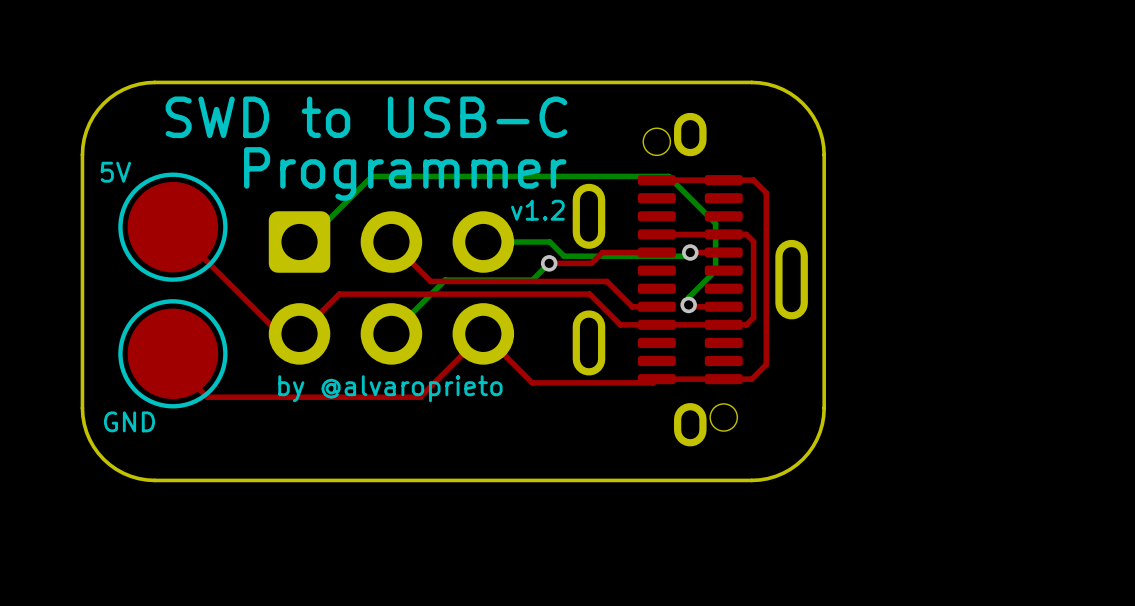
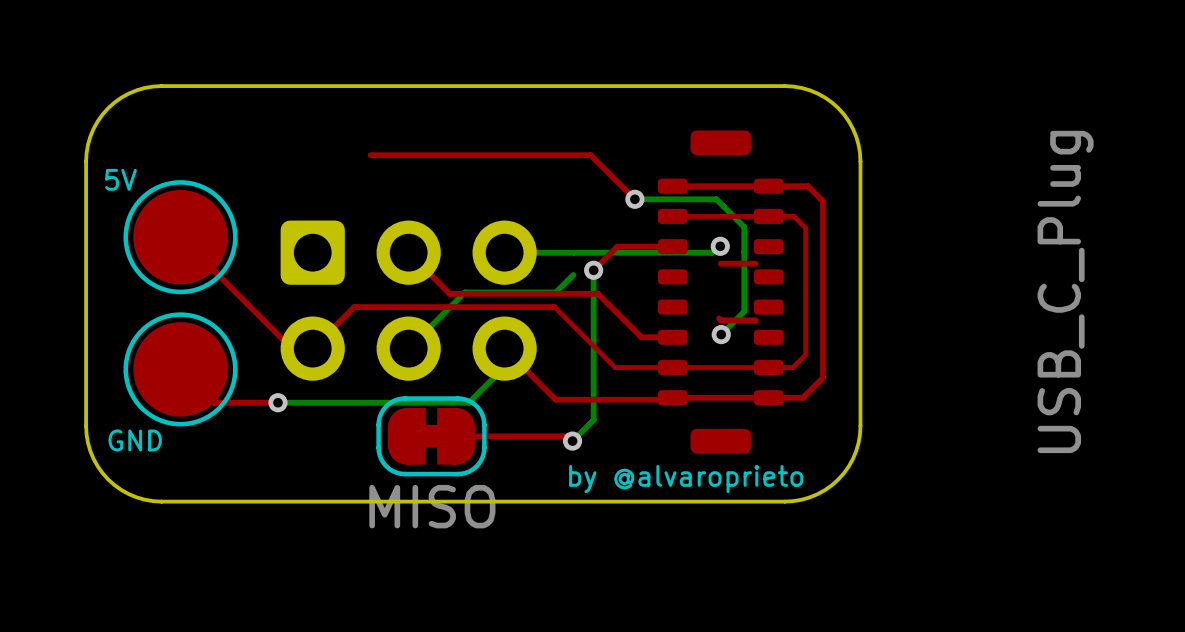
part footprint: [572, 112, 808, 447] -> [657, 130, 784, 454]
text: SWD to USB-C (366, 117) -> none
top track: none -> (370, 155) (590, 155) (634, 199)
text: Programmer (405, 173) -> none
top track: (656, 180) (753, 180) (766, 192) (766, 364) (751, 379) (656, 379) (653, 382) (642, 382) -> (672, 186) (807, 186) (822, 201) (822, 377) (803, 397) (672, 397) (670, 399)
bottom track: none -> (634, 199) (716, 199) (744, 227) (744, 311) (721, 334)
via: none -> (634, 199)
top track: none -> (672, 216) (794, 216) (805, 228) (805, 354) (792, 367) (615, 367) (552, 307)
text: v1.2 (537, 210) -> none
top track: (656, 234) (746, 234) (753, 241) (753, 317) (746, 324) (620, 324) (589, 294) (531, 294) -> none
top track: none -> (672, 246) (617, 246) (593, 270)
bottom track: (299, 242) (306, 242) (371, 176) (668, 176) (715, 223) (715, 270) (688, 297) (688, 304) -> none
bottom track: (549, 242) (564, 256) (686, 256) (690, 252) -> (574, 252) (712, 252) (720, 246)
top track: (656, 252) (602, 252) (591, 263) (549, 263) -> none
via position: (690, 252) -> (720, 246)
bottom track: none -> (593, 270) (593, 419) (572, 441)
via: none -> (593, 270)
via: (549, 263) -> none
part value: none -> USB_C_Plug (1065, 291)
top track: (572, 281) (607, 281) (632, 306) (656, 306) -> (598, 293) (641, 337) (672, 337)
via position: (688, 304) -> (721, 334)
top track: (483, 333) (420, 397) (207, 397) (181, 371) -> none
bottom track: none -> (504, 348) (504, 367) (468, 402) (277, 402)
top track: none -> (180, 369) (213, 402) (277, 402)
via: none -> (277, 402)
text position: by @alvaroprieto (390, 388) -> by @alvaroprieto (686, 479)
part: none -> MISO (431, 436)
top track: none -> (456, 436) (567, 436) (572, 441)
via: none -> (572, 441)

